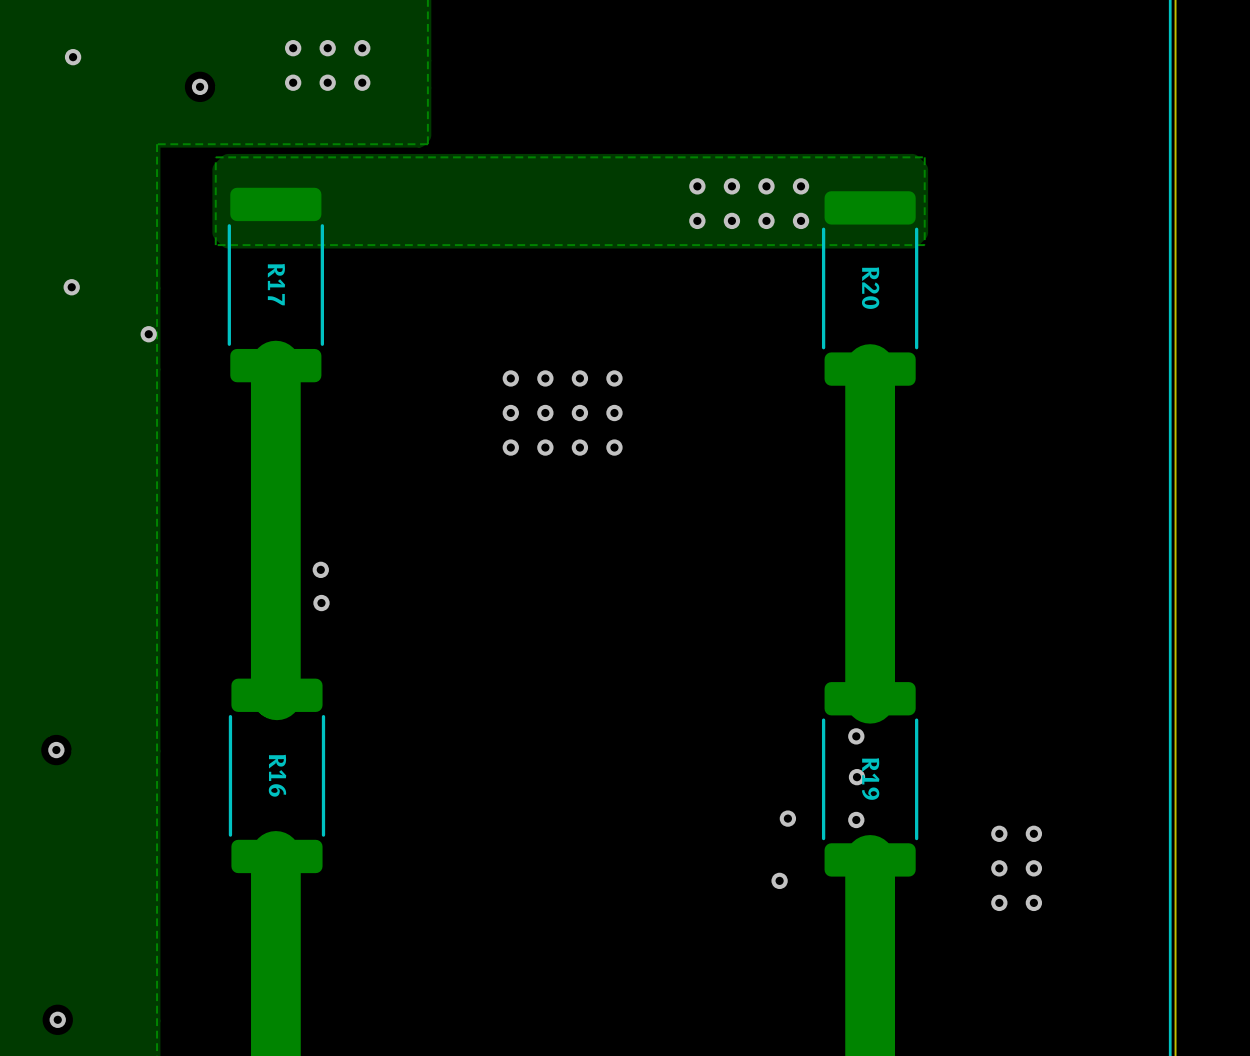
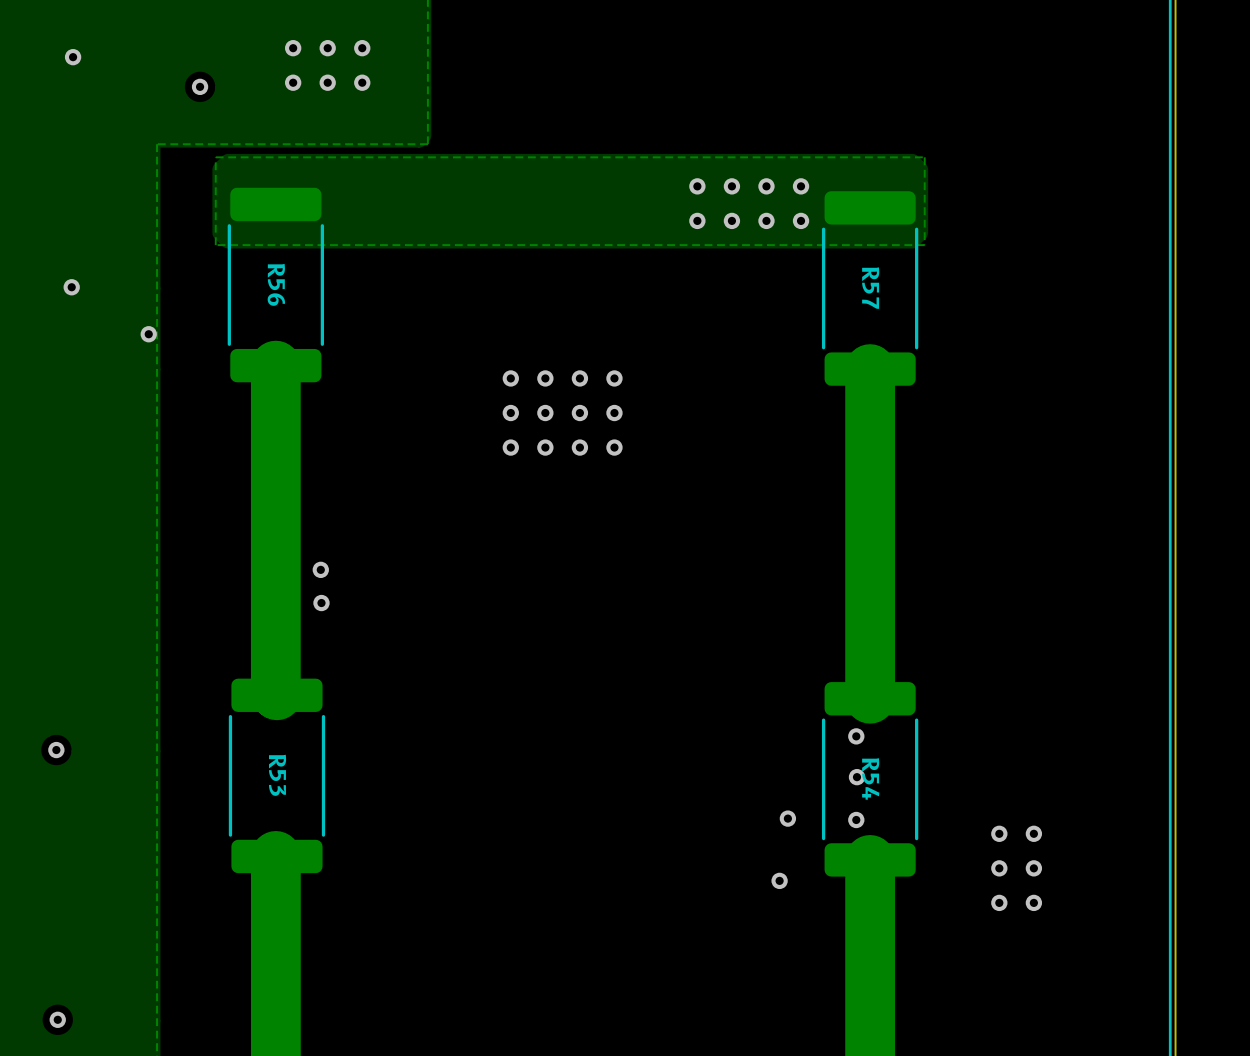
R17 name: R17 (276, 284) -> R56 (276, 284)
R20 name: R20 (870, 288) -> R57 (870, 288)
R16 name: R16 (277, 775) -> R53 (277, 775)
R19 name: R19 (870, 779) -> R54 (870, 779)

